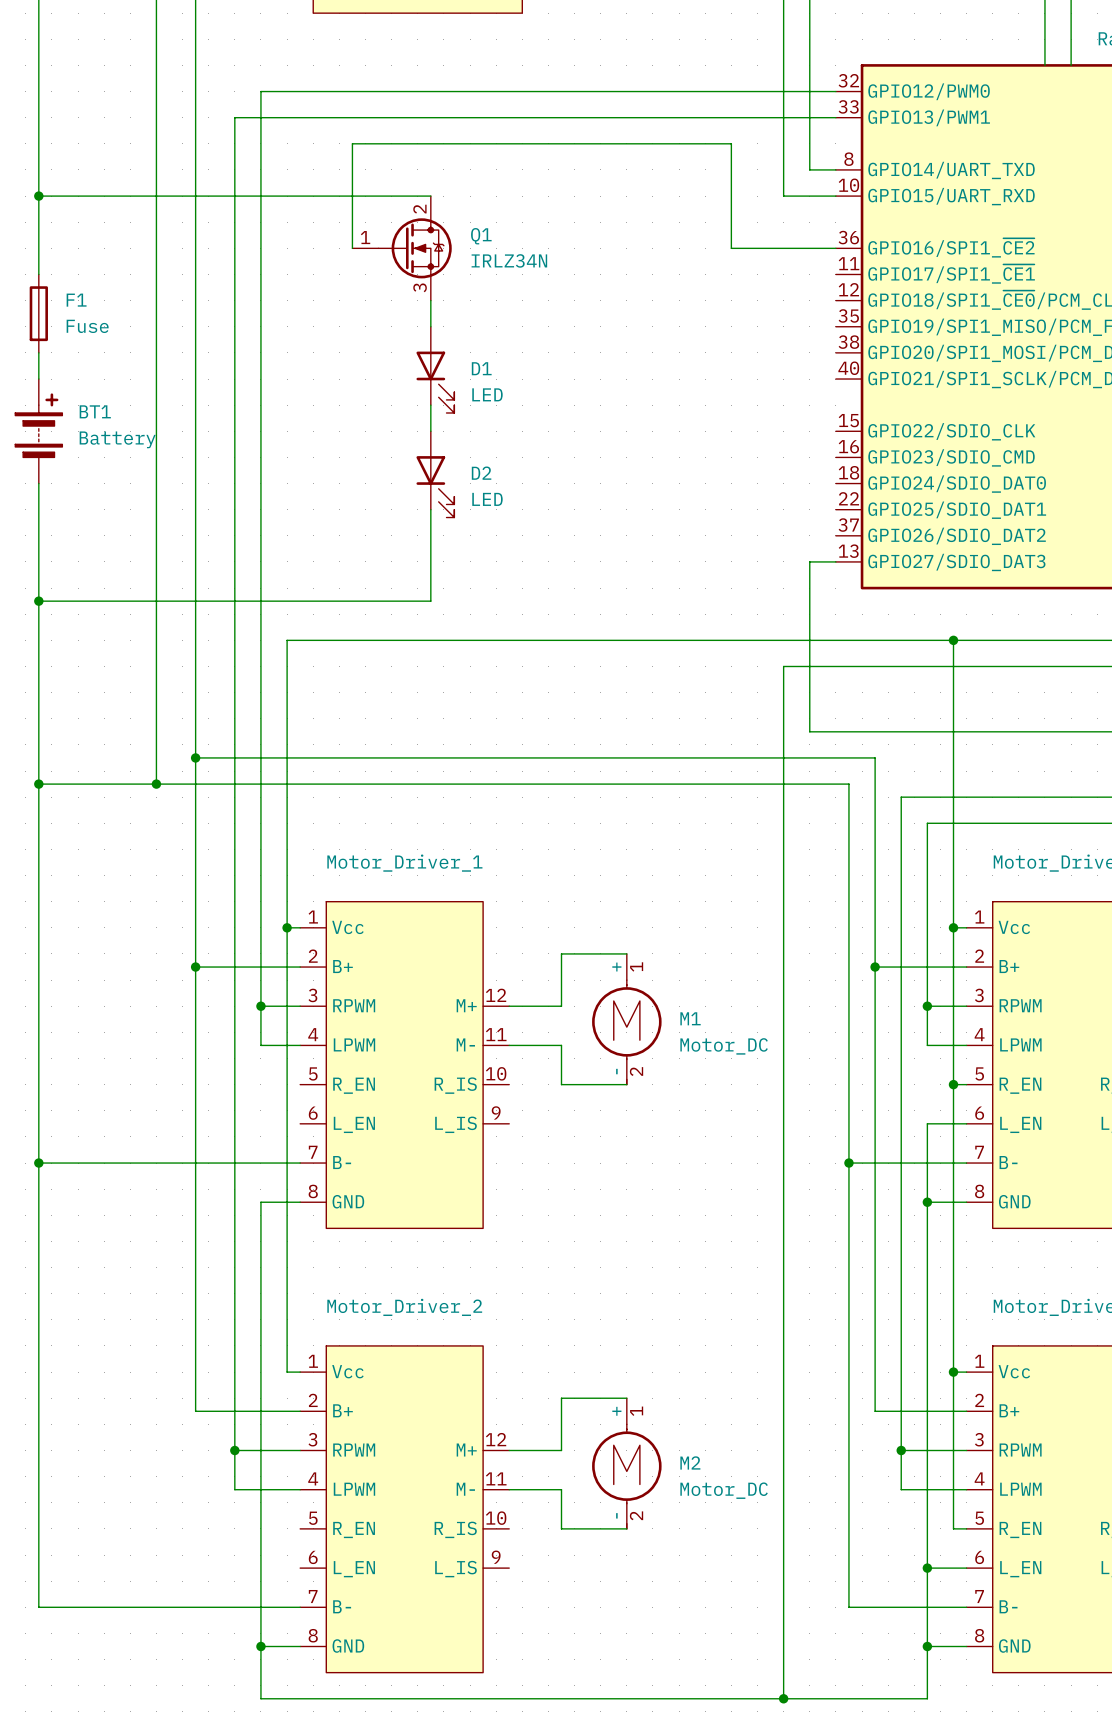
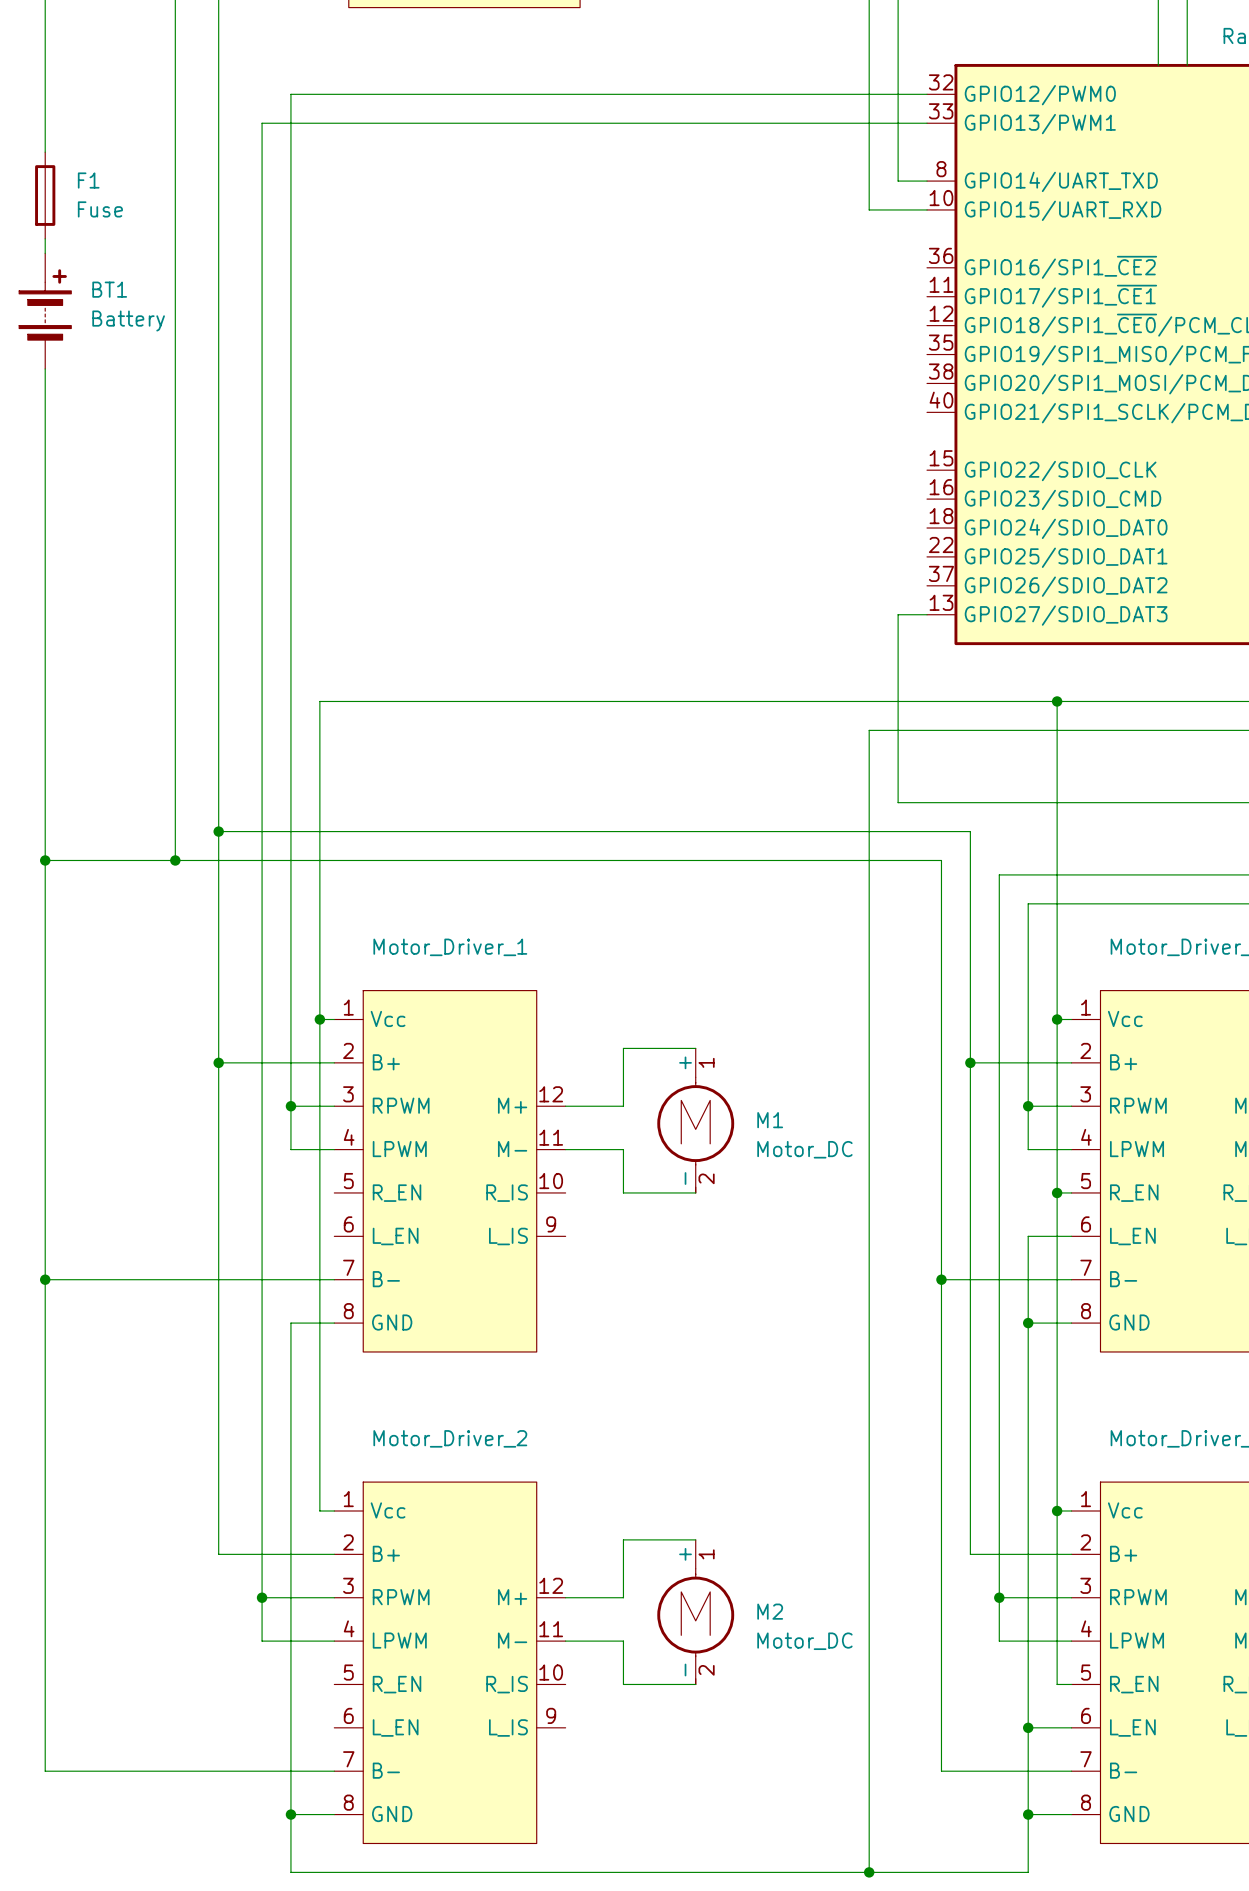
wire: (38, 196) (430, 196) -> none
junction: (38, 196) -> none
wire: (352, 248) (352, 143) (731, 143) (731, 248) (835, 248) -> none
Q1: IRLZ34N (402, 248) -> none
wire: (430, 300) (430, 326) -> none
F1 position: (38, 313) -> (45, 195)
D1: LED (435, 369) -> none
wire: (430, 405) (430, 431) -> none
BT1 position: (38, 431) -> (45, 311)
D2: LED (435, 474) -> none
wire: (430, 509) (430, 601) (38, 601) -> none
junction: (38, 601) -> none

